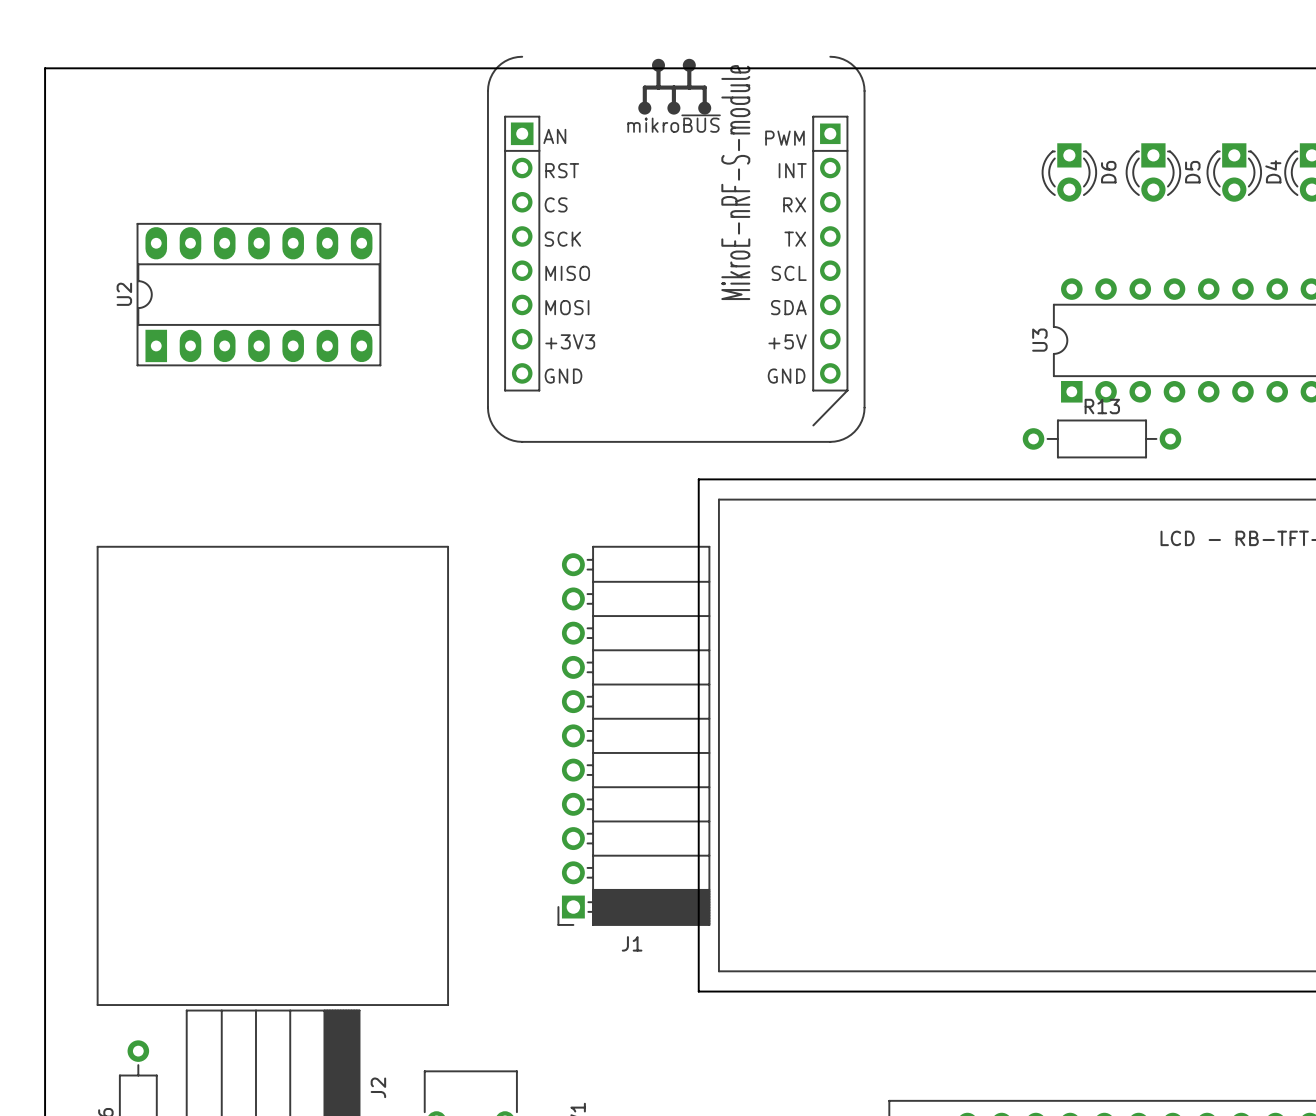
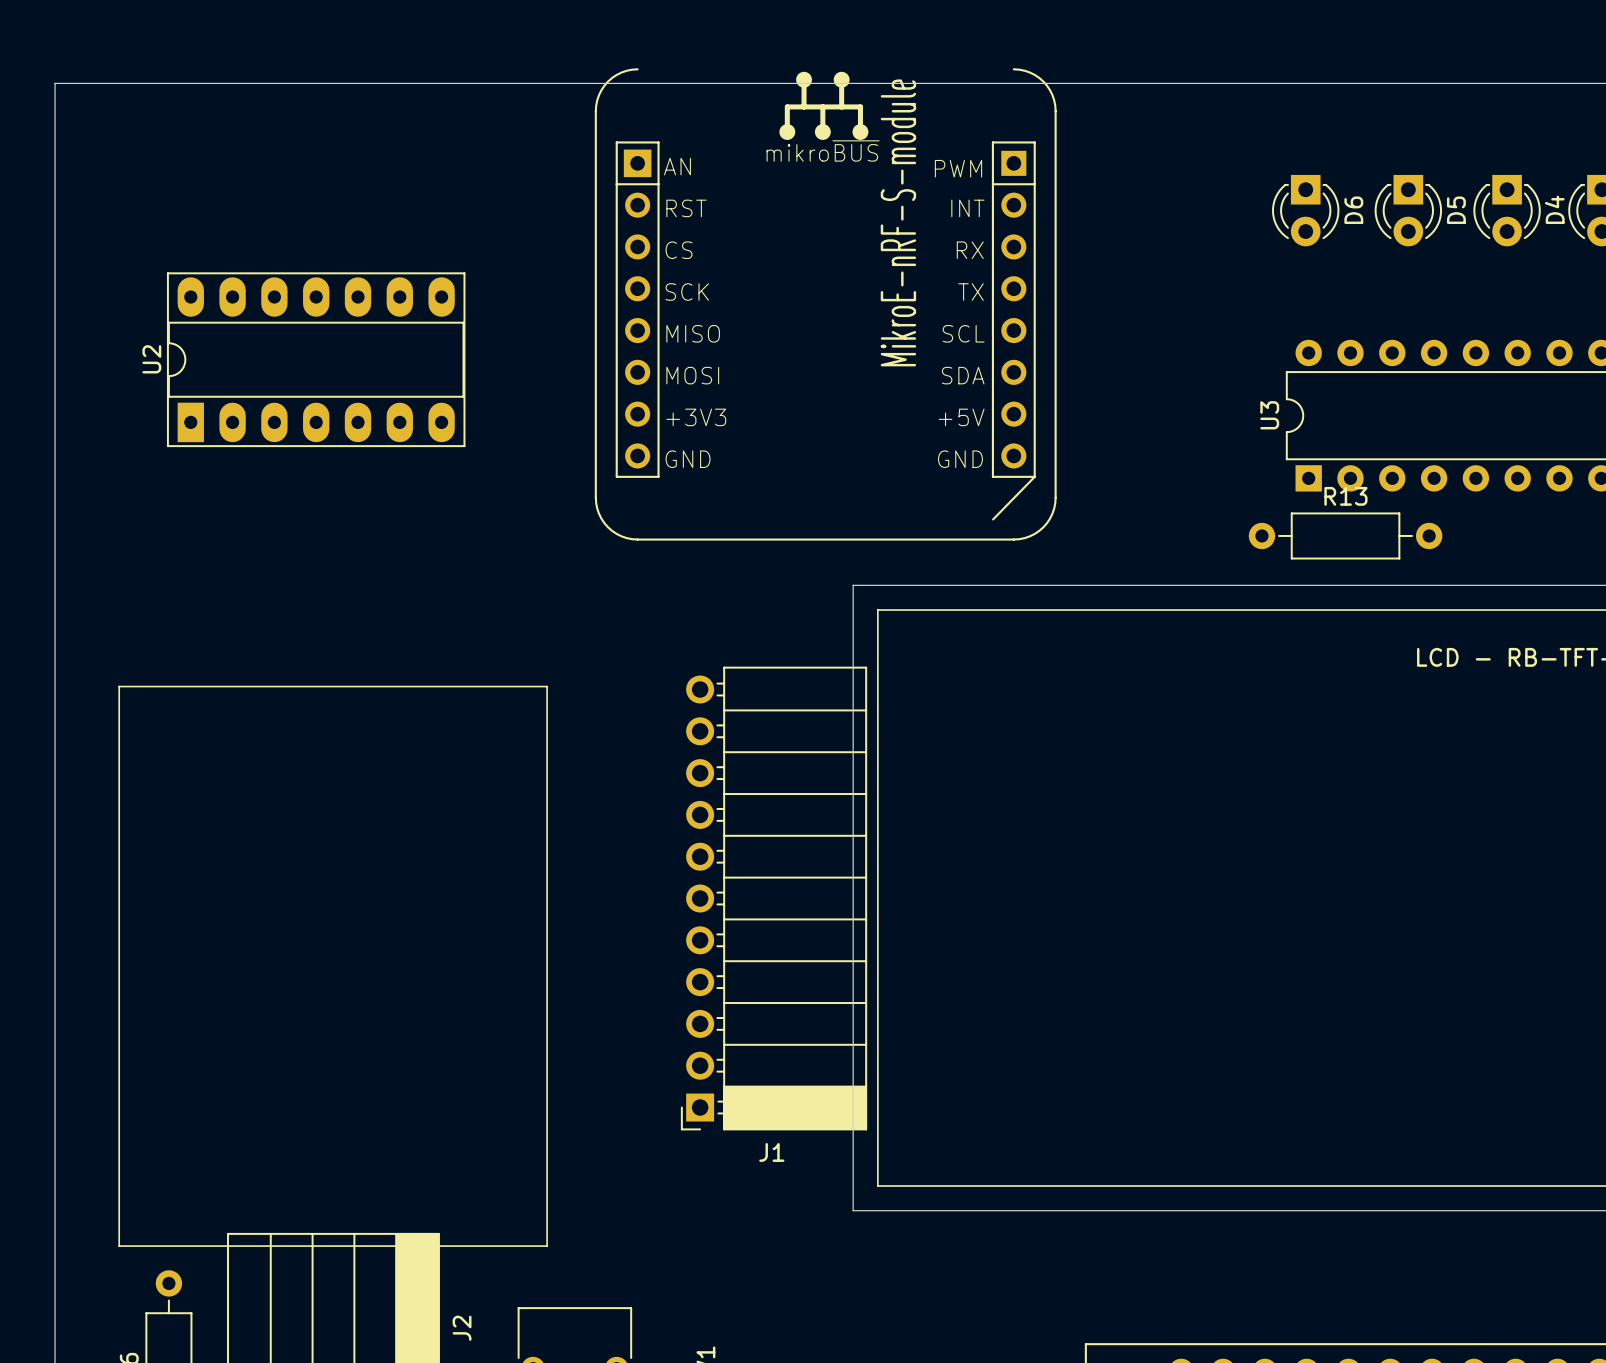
line: (97, 562) (97, 546) (448, 546) (448, 562) -> (119, 686) (547, 686)
line: (97, 1005) (448, 1005) -> (119, 1227) (119, 1246) (547, 1246) (547, 1227)

